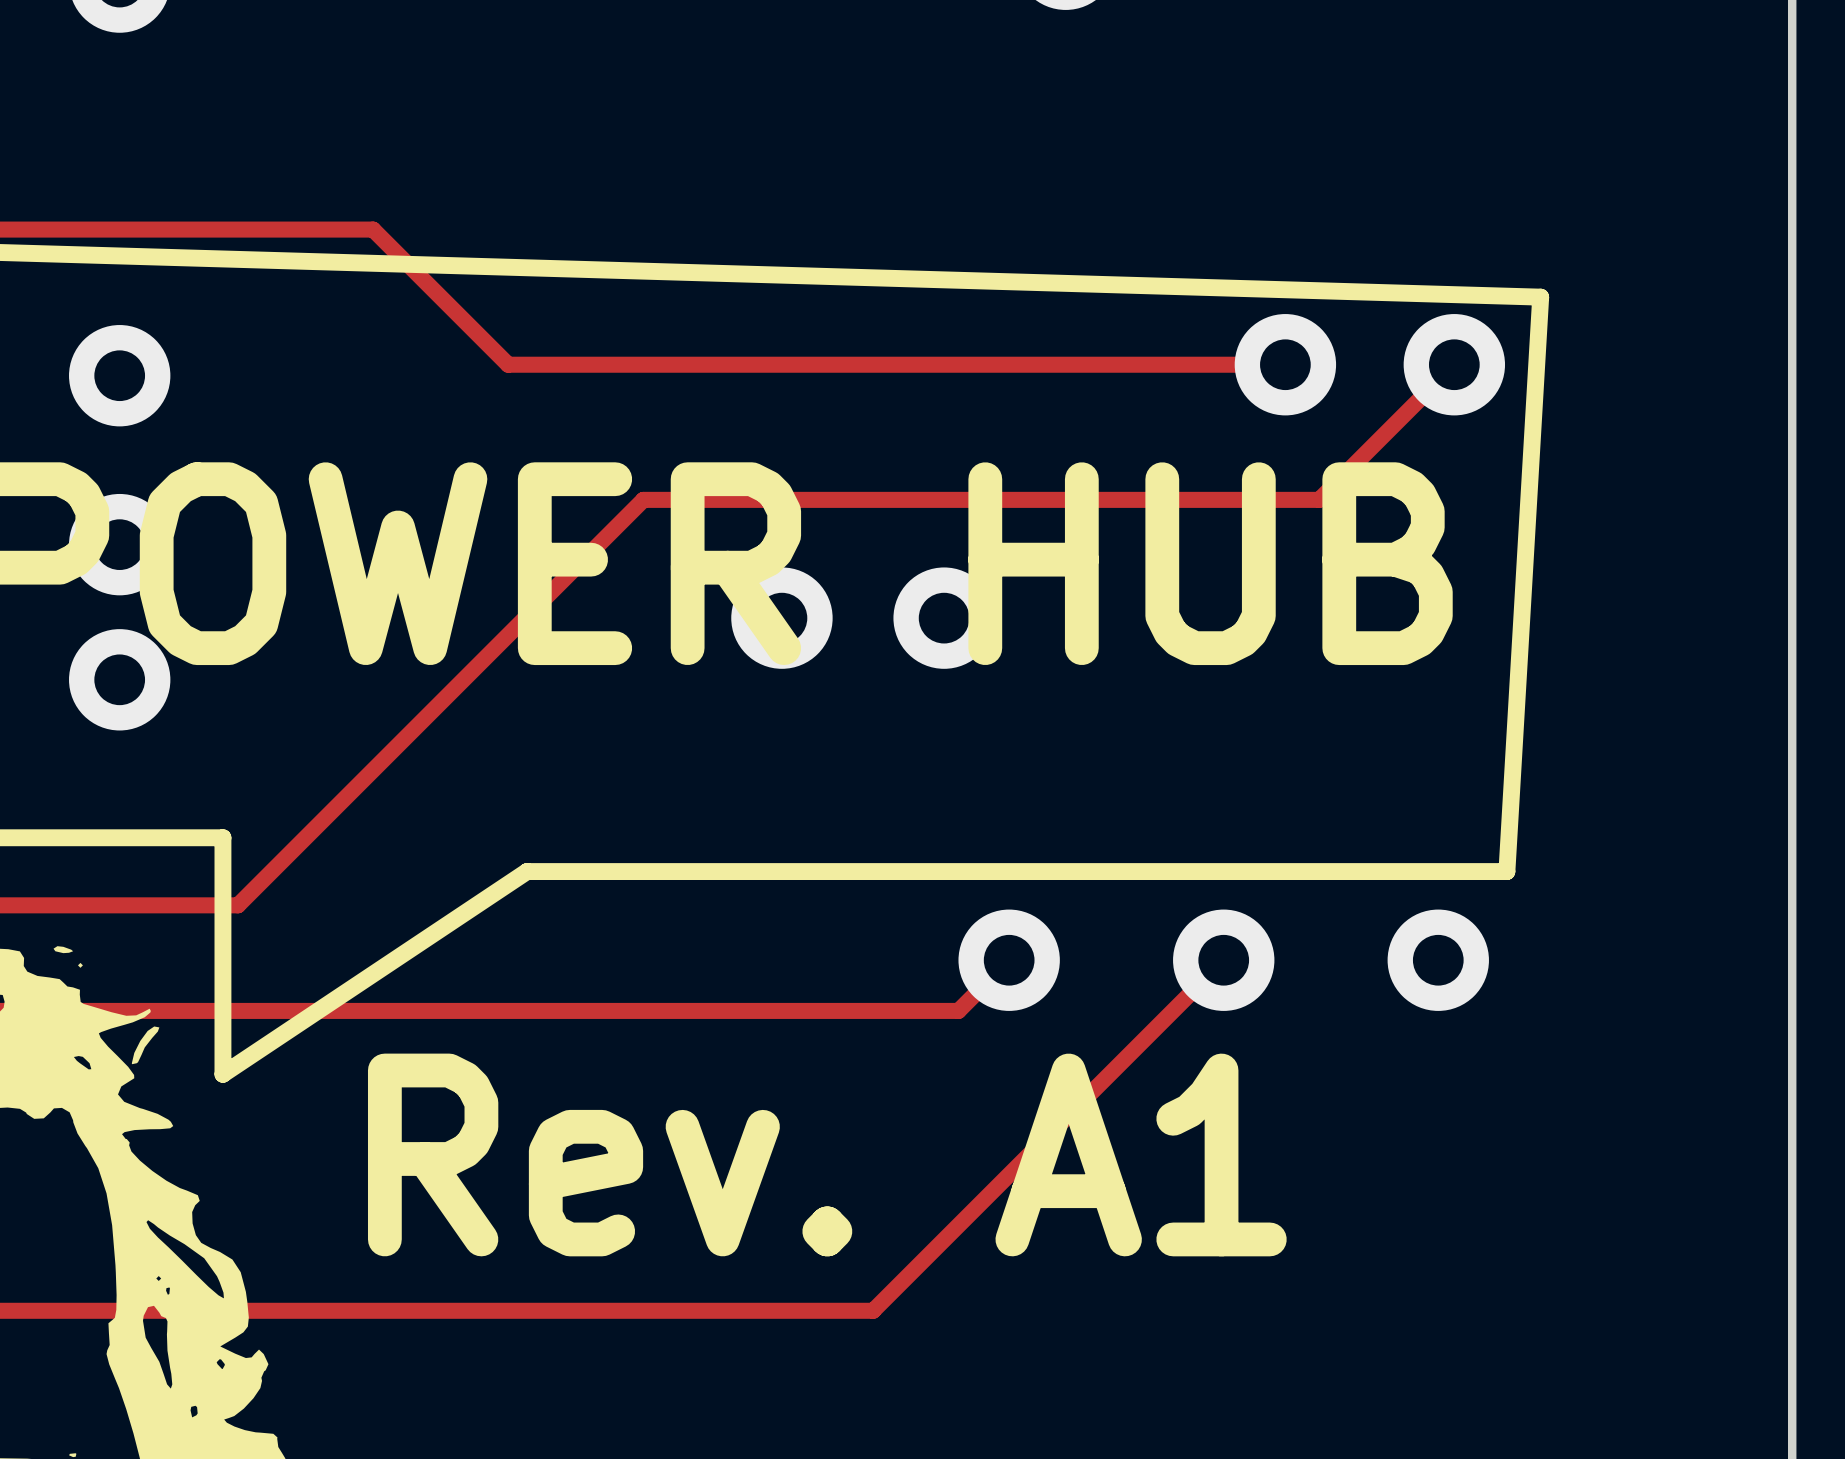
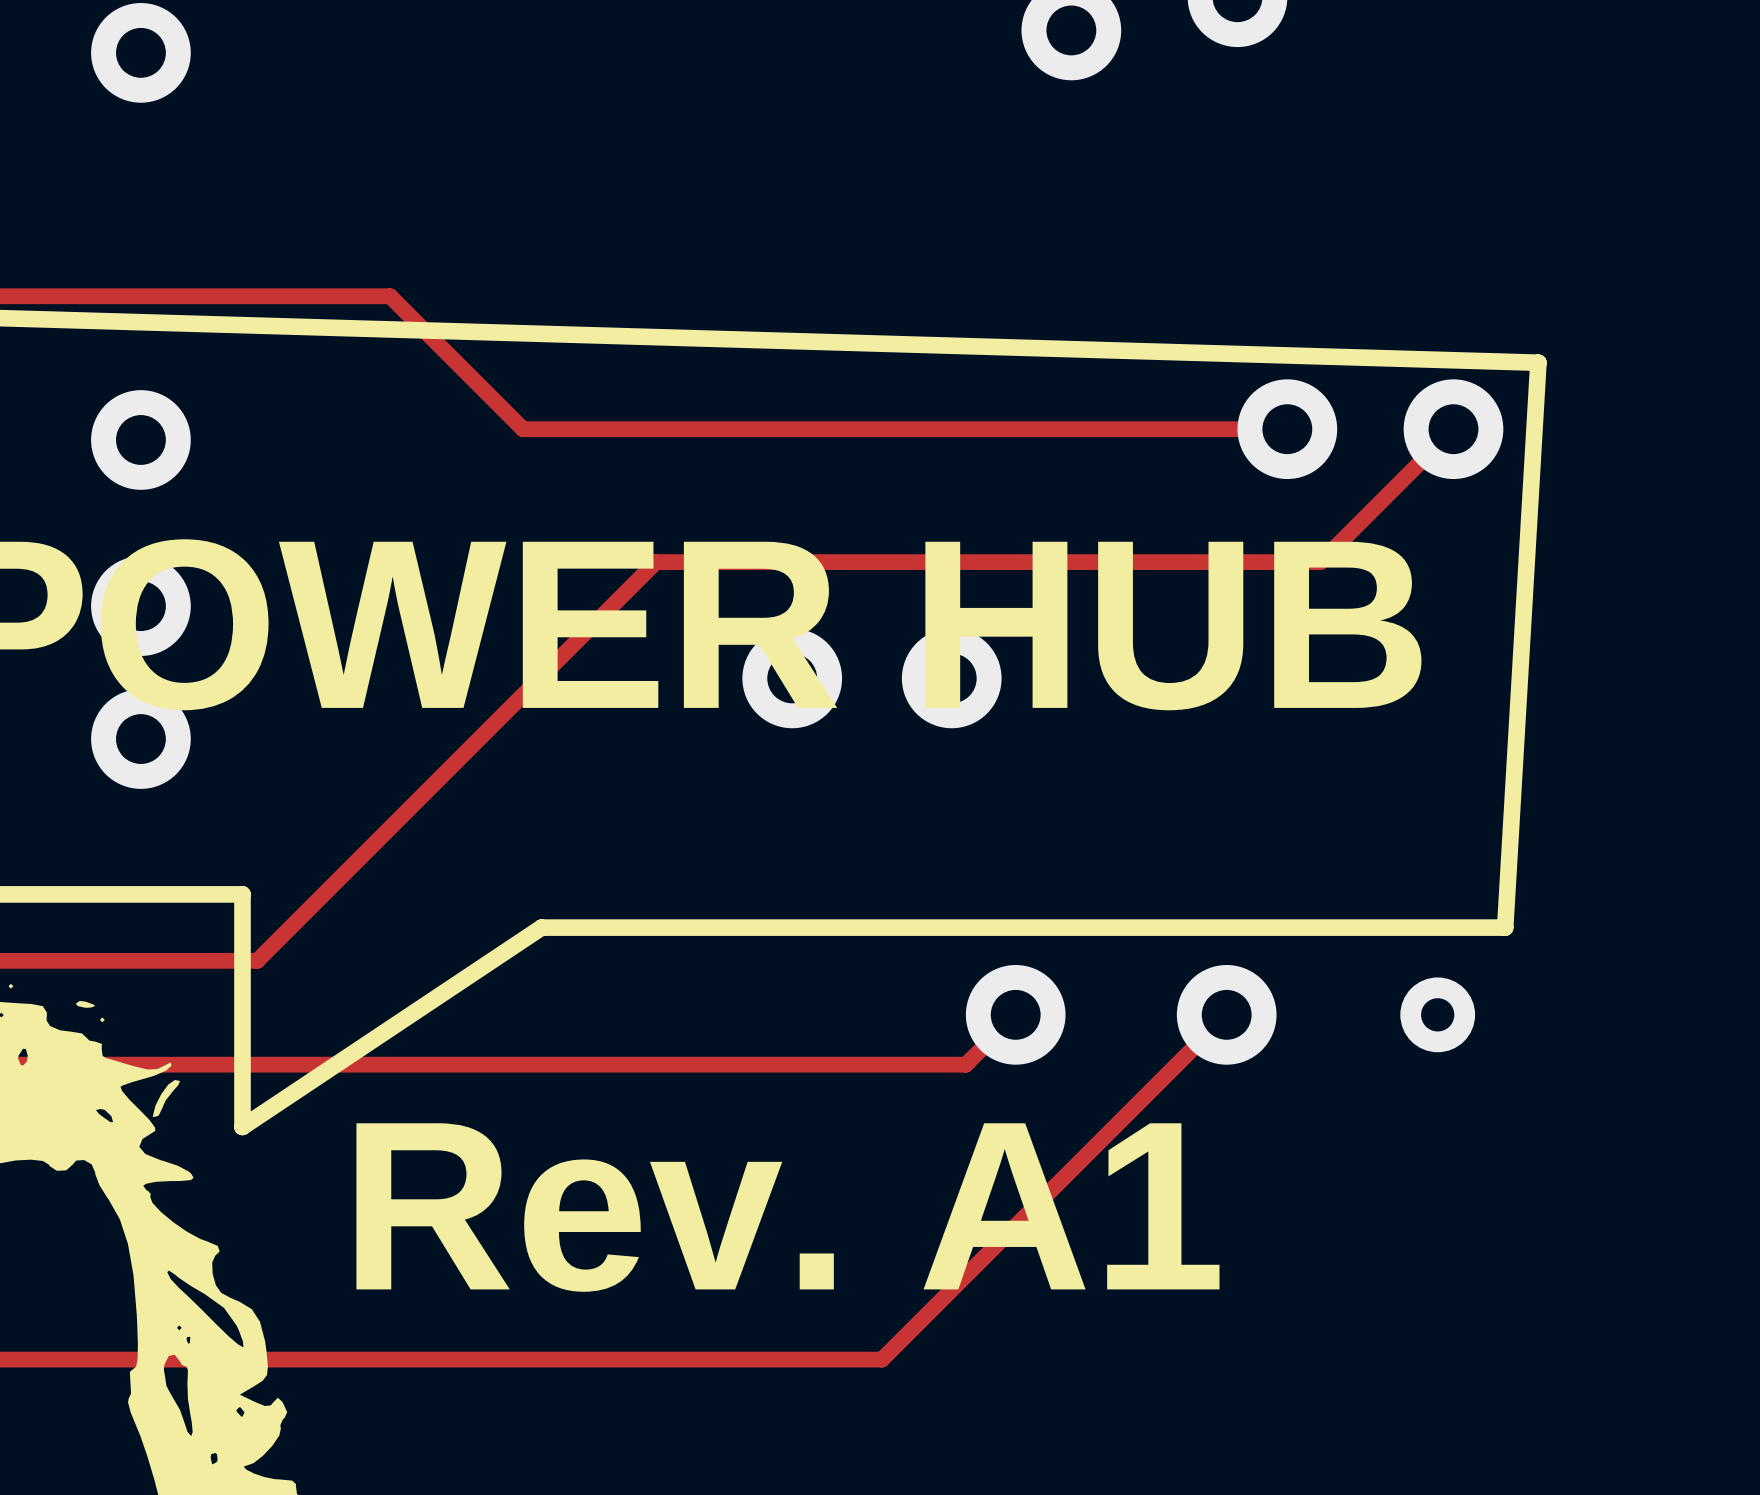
via size: [1387, 909, 1489, 1011] -> [1400, 977, 1476, 1053]

